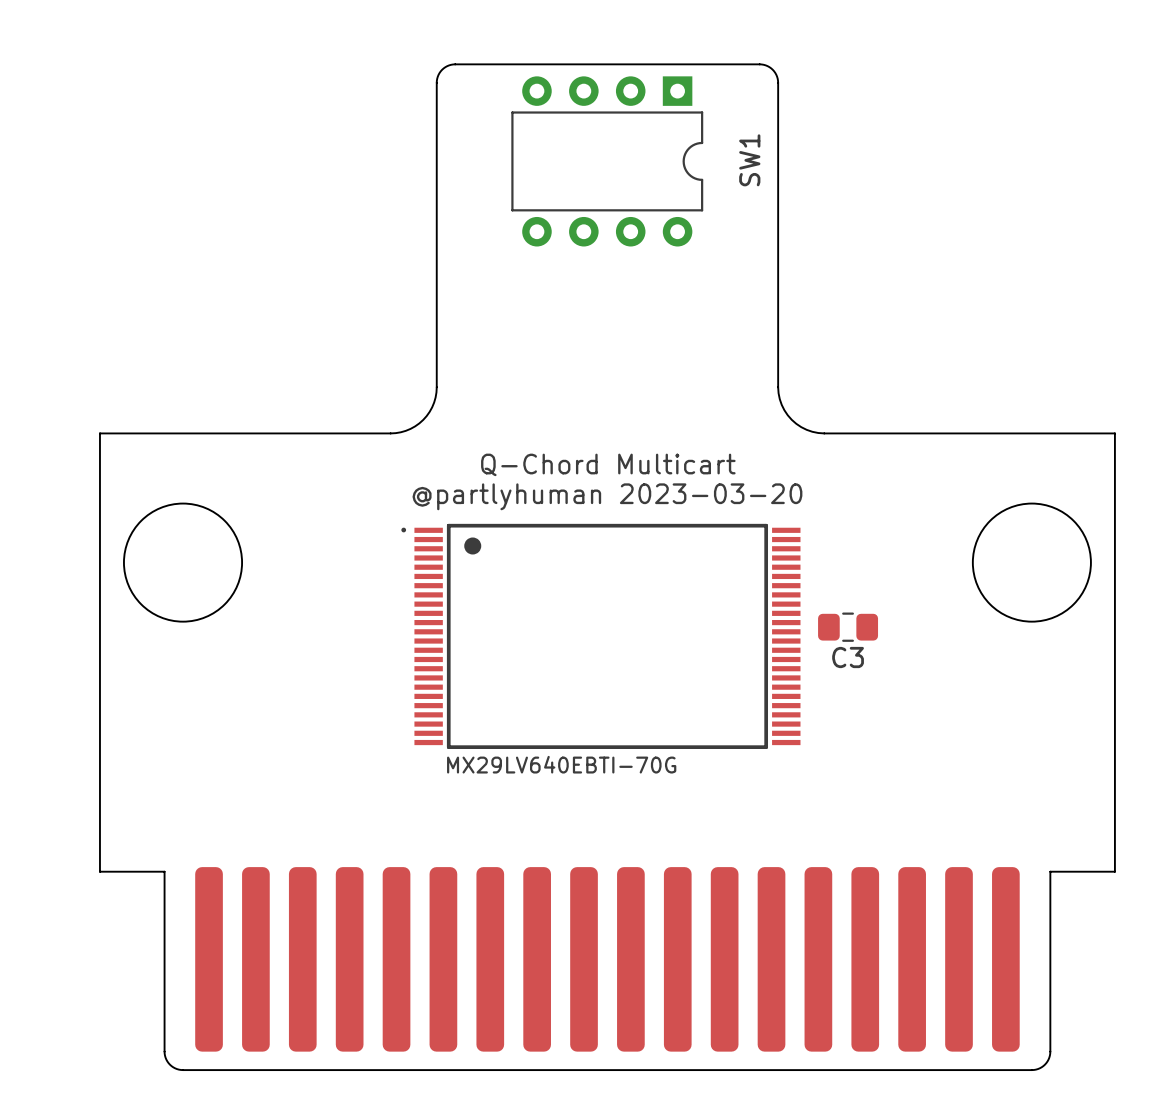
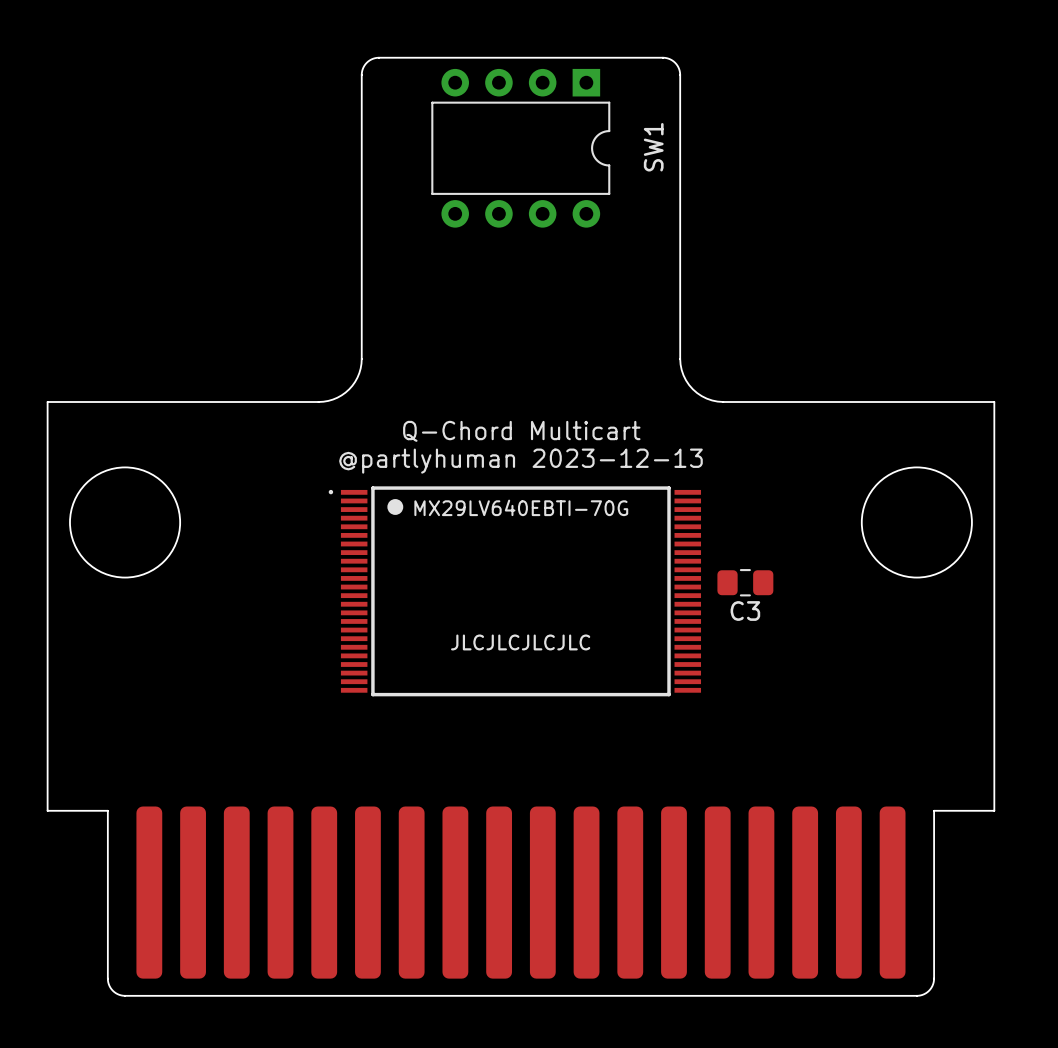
text: @partlyhuman 2023-03-20 (607, 496) -> @partlyhuman 2023-12-13 (520, 461)
text: none -> JLCJLCJLCJLC (520, 642)
part value position: MX29LV640EBTI-70G (561, 764) -> MX29LV640EBTI-70G (521, 507)

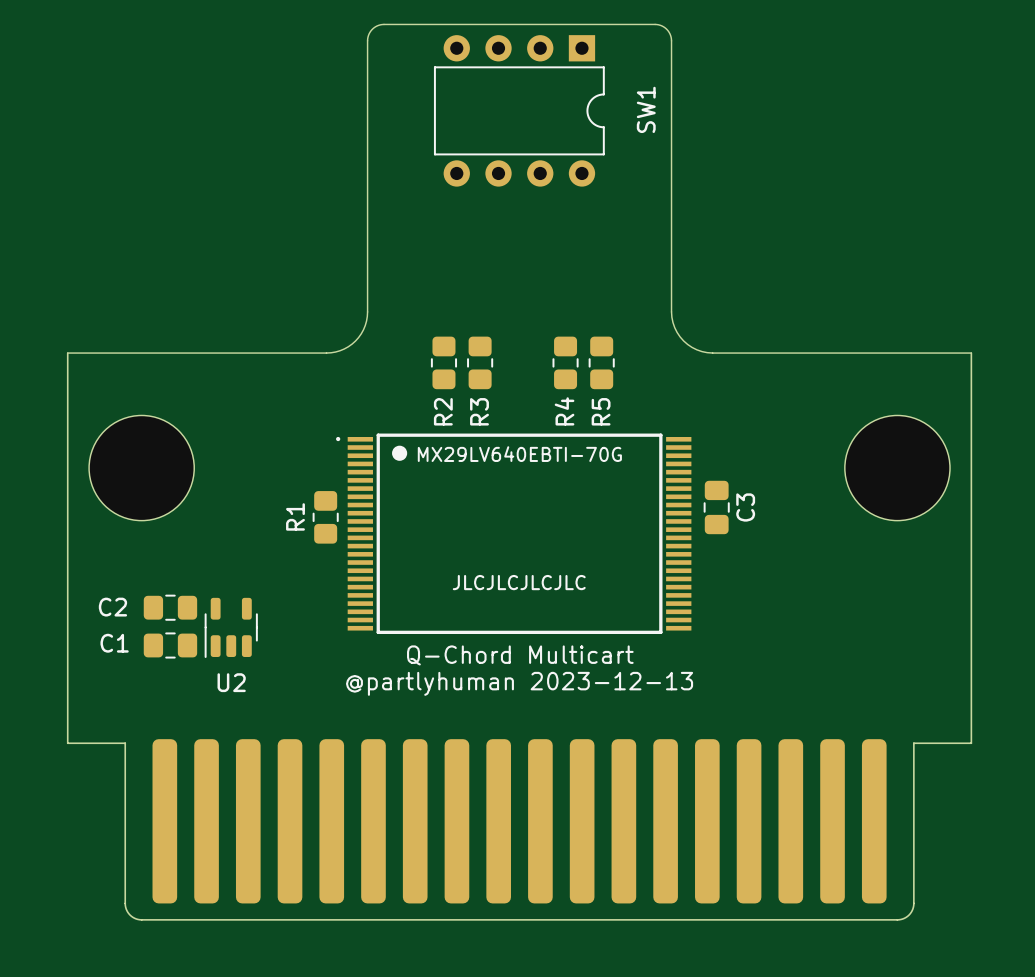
R2: none -> (443, 362)
R3: none -> (480, 362)
R4: none -> (565, 362)
R5: none -> (601, 362)
text position: Q-Chord Multicart (521, 431) -> Q-Chord Multicart (520, 655)
text position: @partlyhuman 2023-12-13 (520, 461) -> @partlyhuman 2023-12-13 (519, 683)
R1: none -> (325, 517)
C3 rotation: 0° (745, 582) -> 90° clockwise (716, 507)
C3 name position: C3 (745, 611) -> C3 (745, 507)
C2: none -> (170, 607)
U2: none -> (231, 627)
C1: none -> (170, 645)

